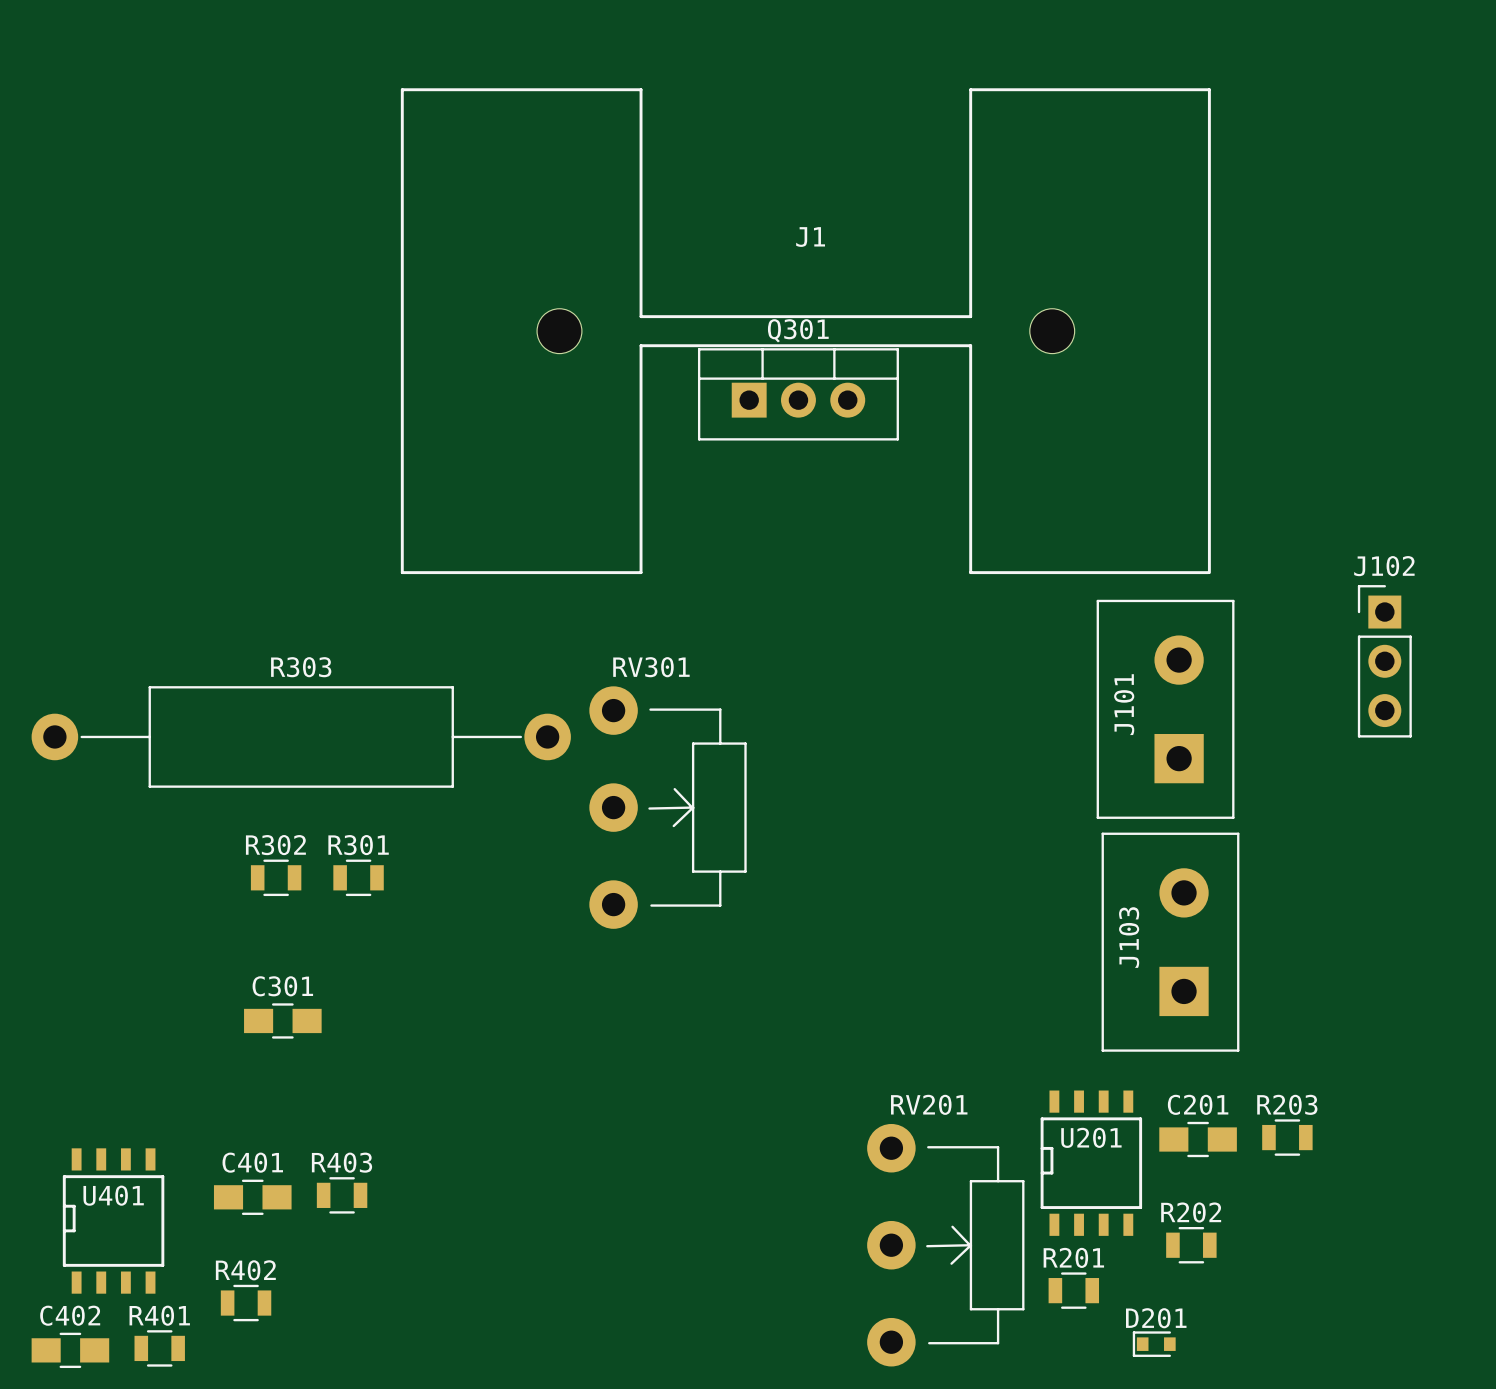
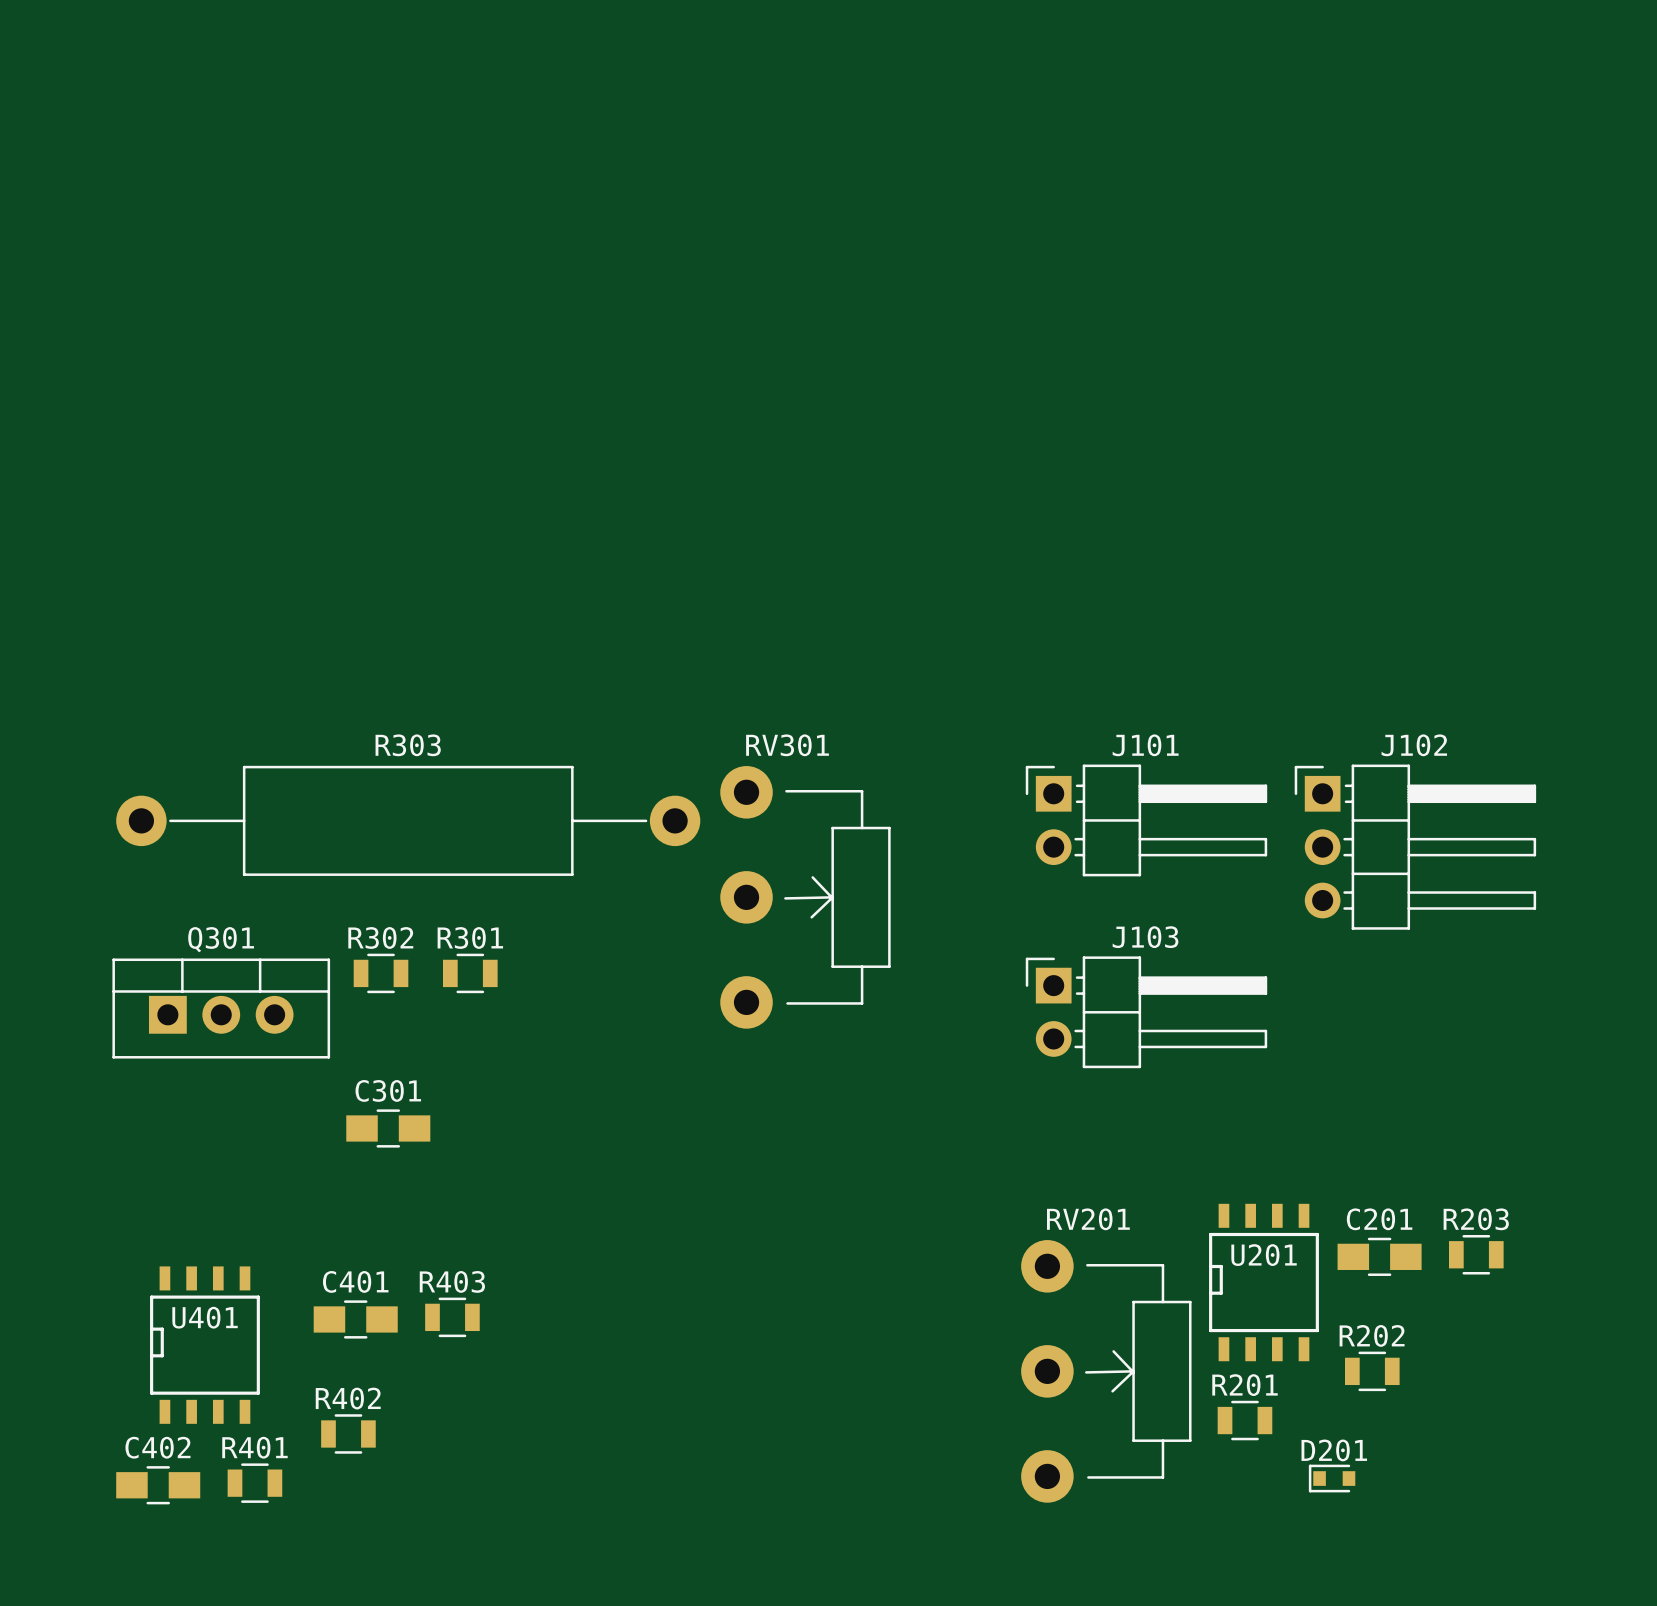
J1: (805, 331) -> none
Q301 position: (798, 394) -> (221, 1008)
J102 footprint: [1357, 585, 1412, 738] -> [1294, 764, 1537, 930]
J101 footprint: [1096, 599, 1235, 819] -> [1025, 764, 1268, 877]
J101 name position: J101 (1124, 704) -> J101 (1145, 745)
J103 footprint: [1101, 832, 1240, 1052] -> [1025, 956, 1268, 1069]
J103 name position: J103 (1129, 937) -> J103 (1145, 937)

